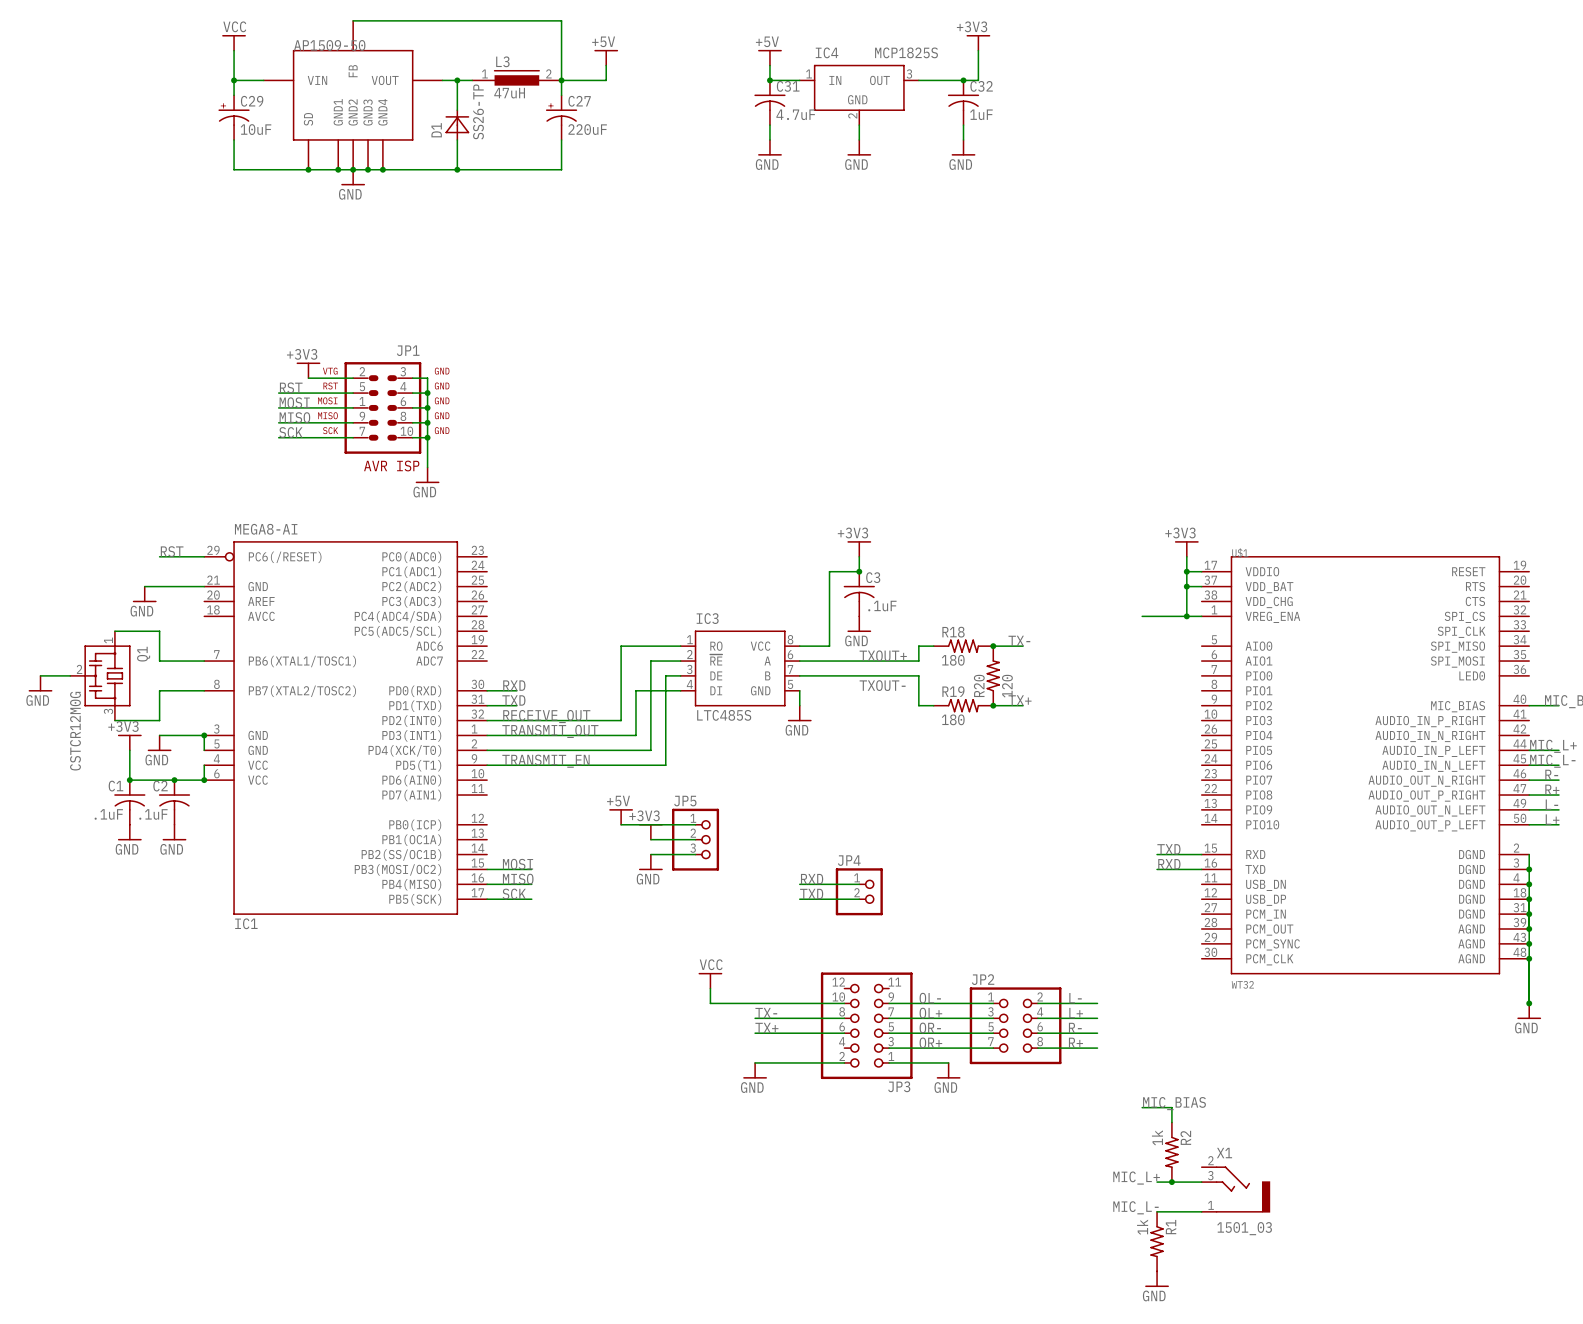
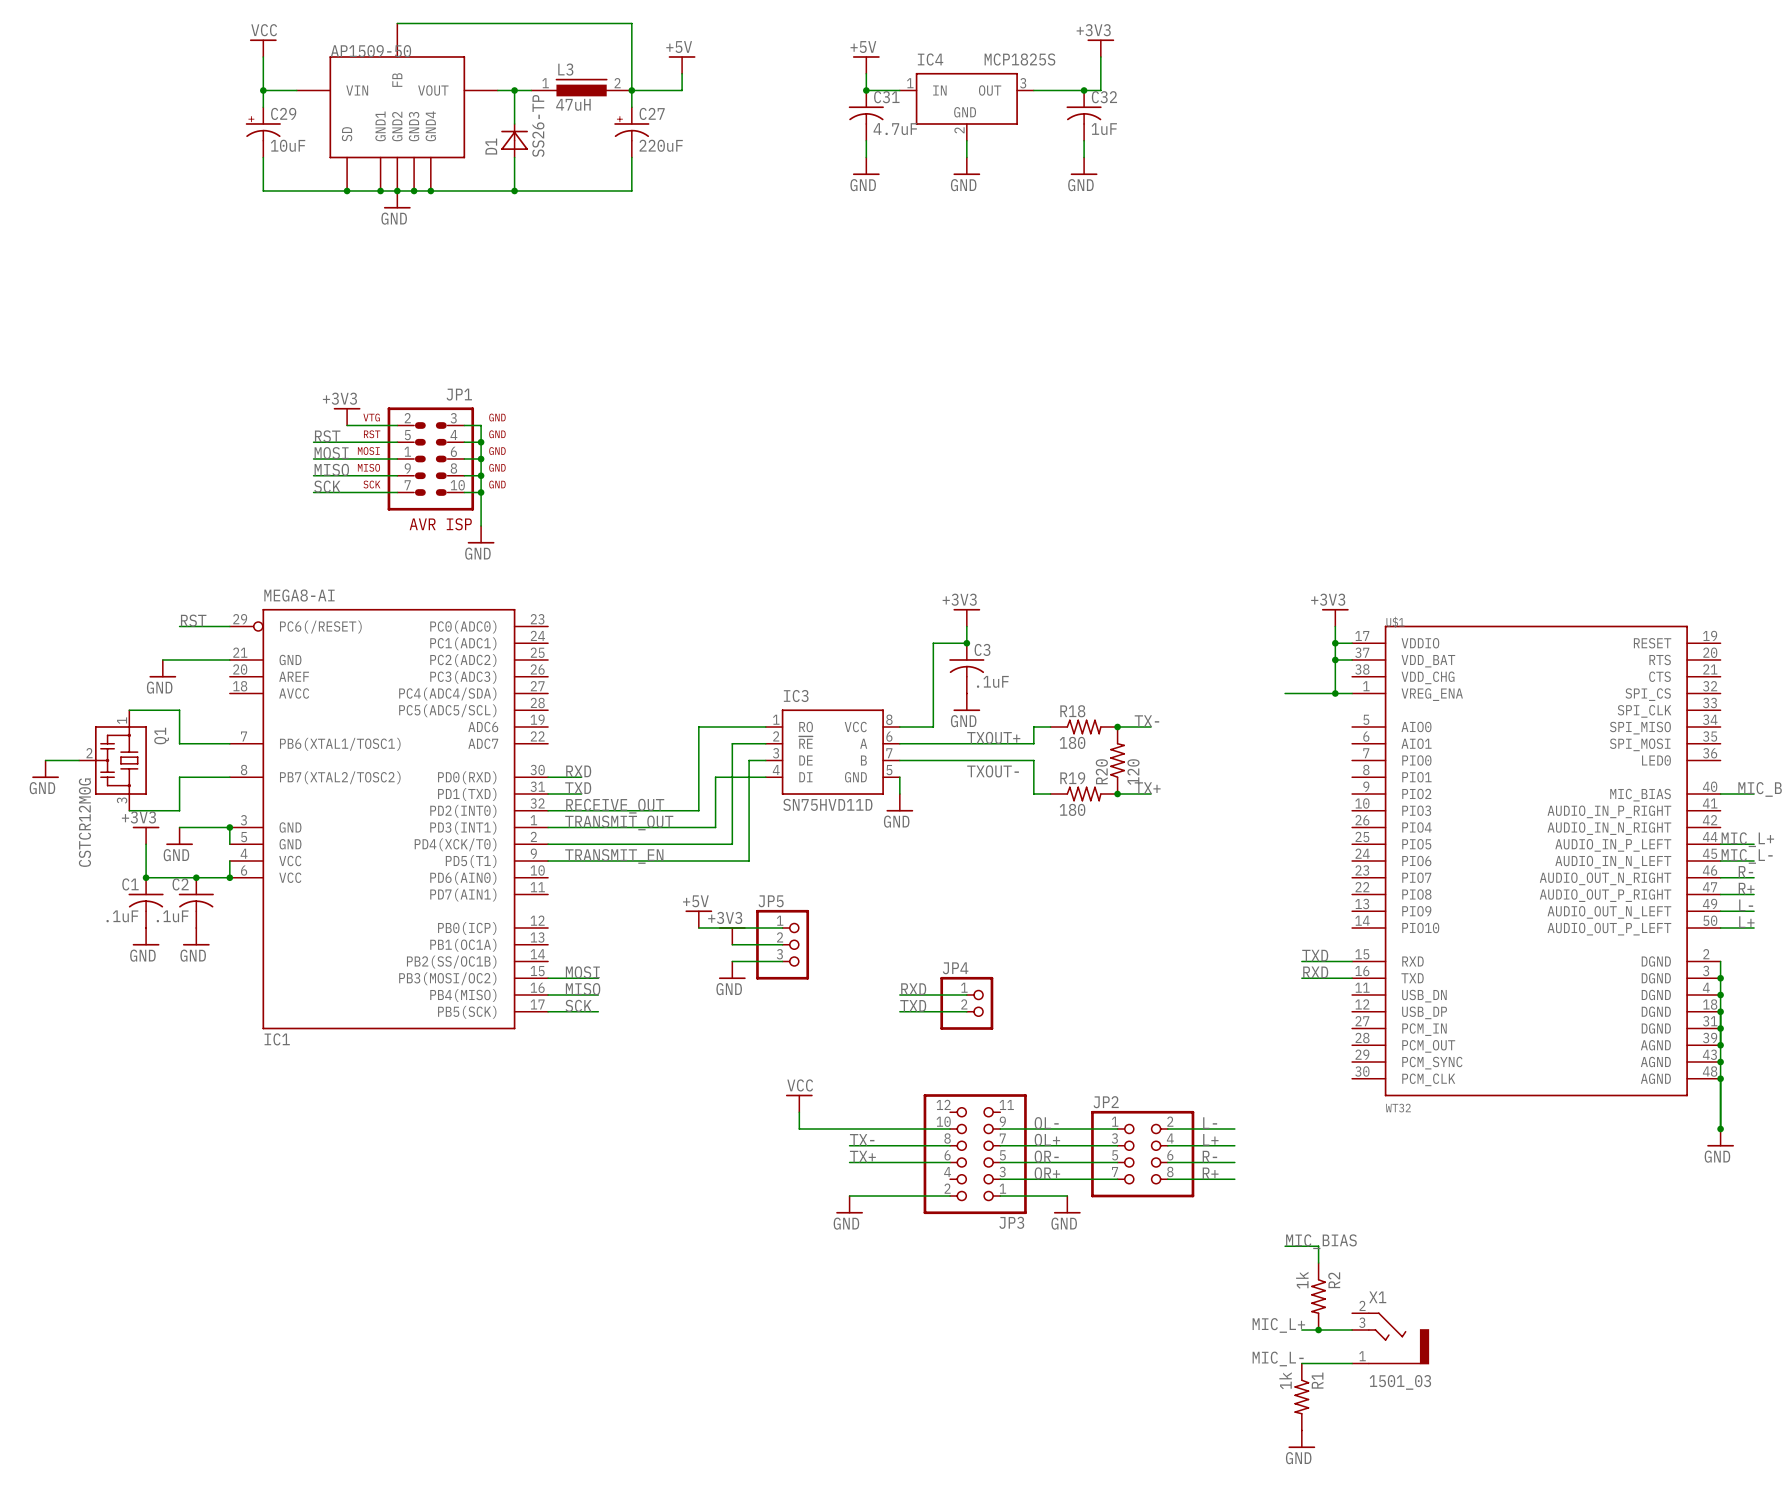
IC3 value: LTC485S (724, 715) -> SN75HVD11D (827, 804)

